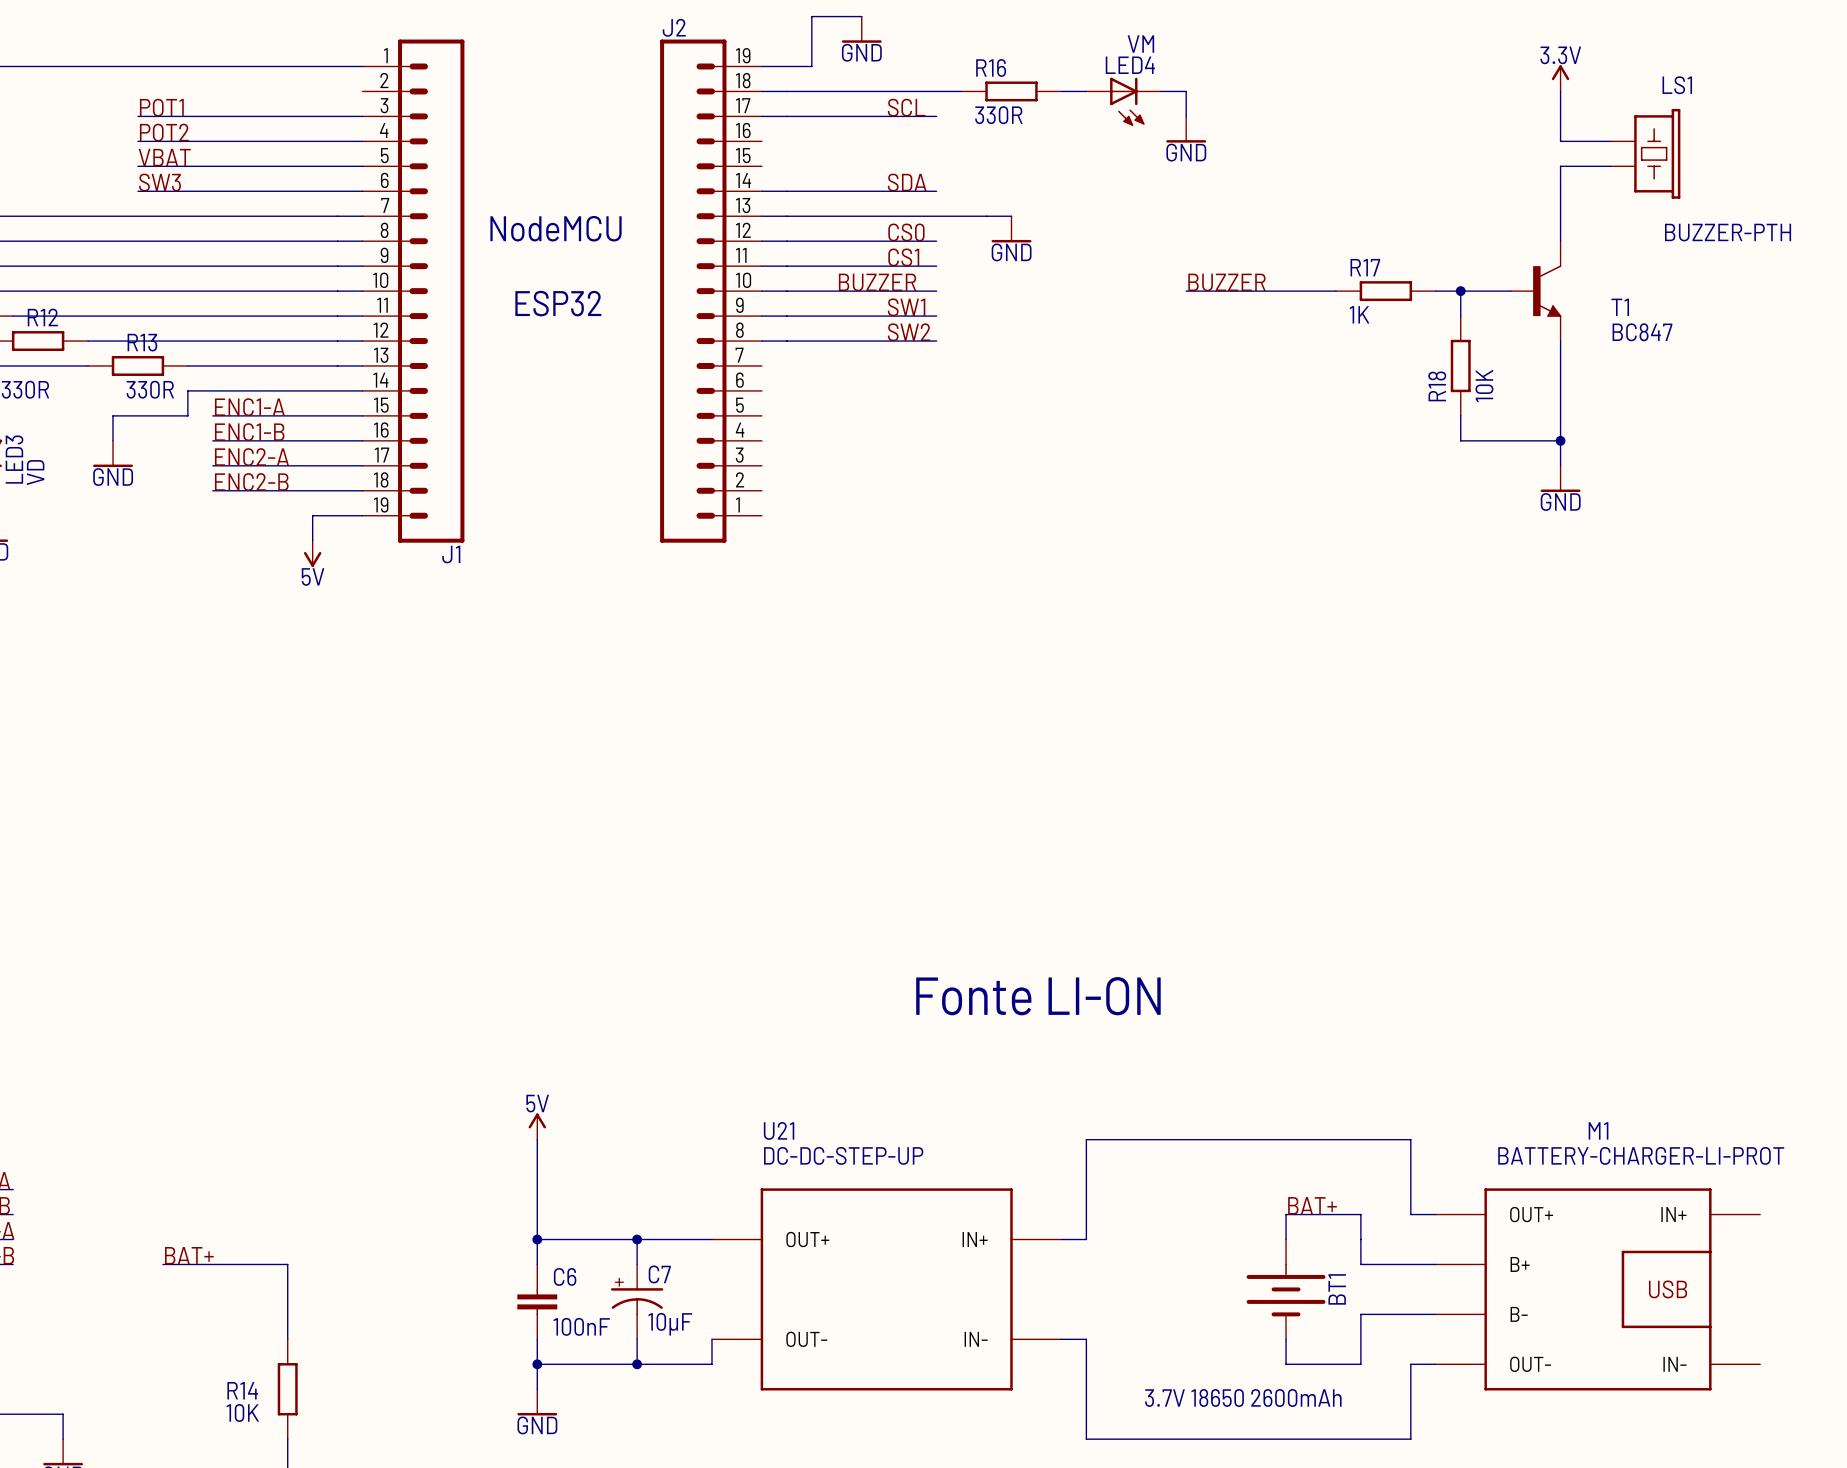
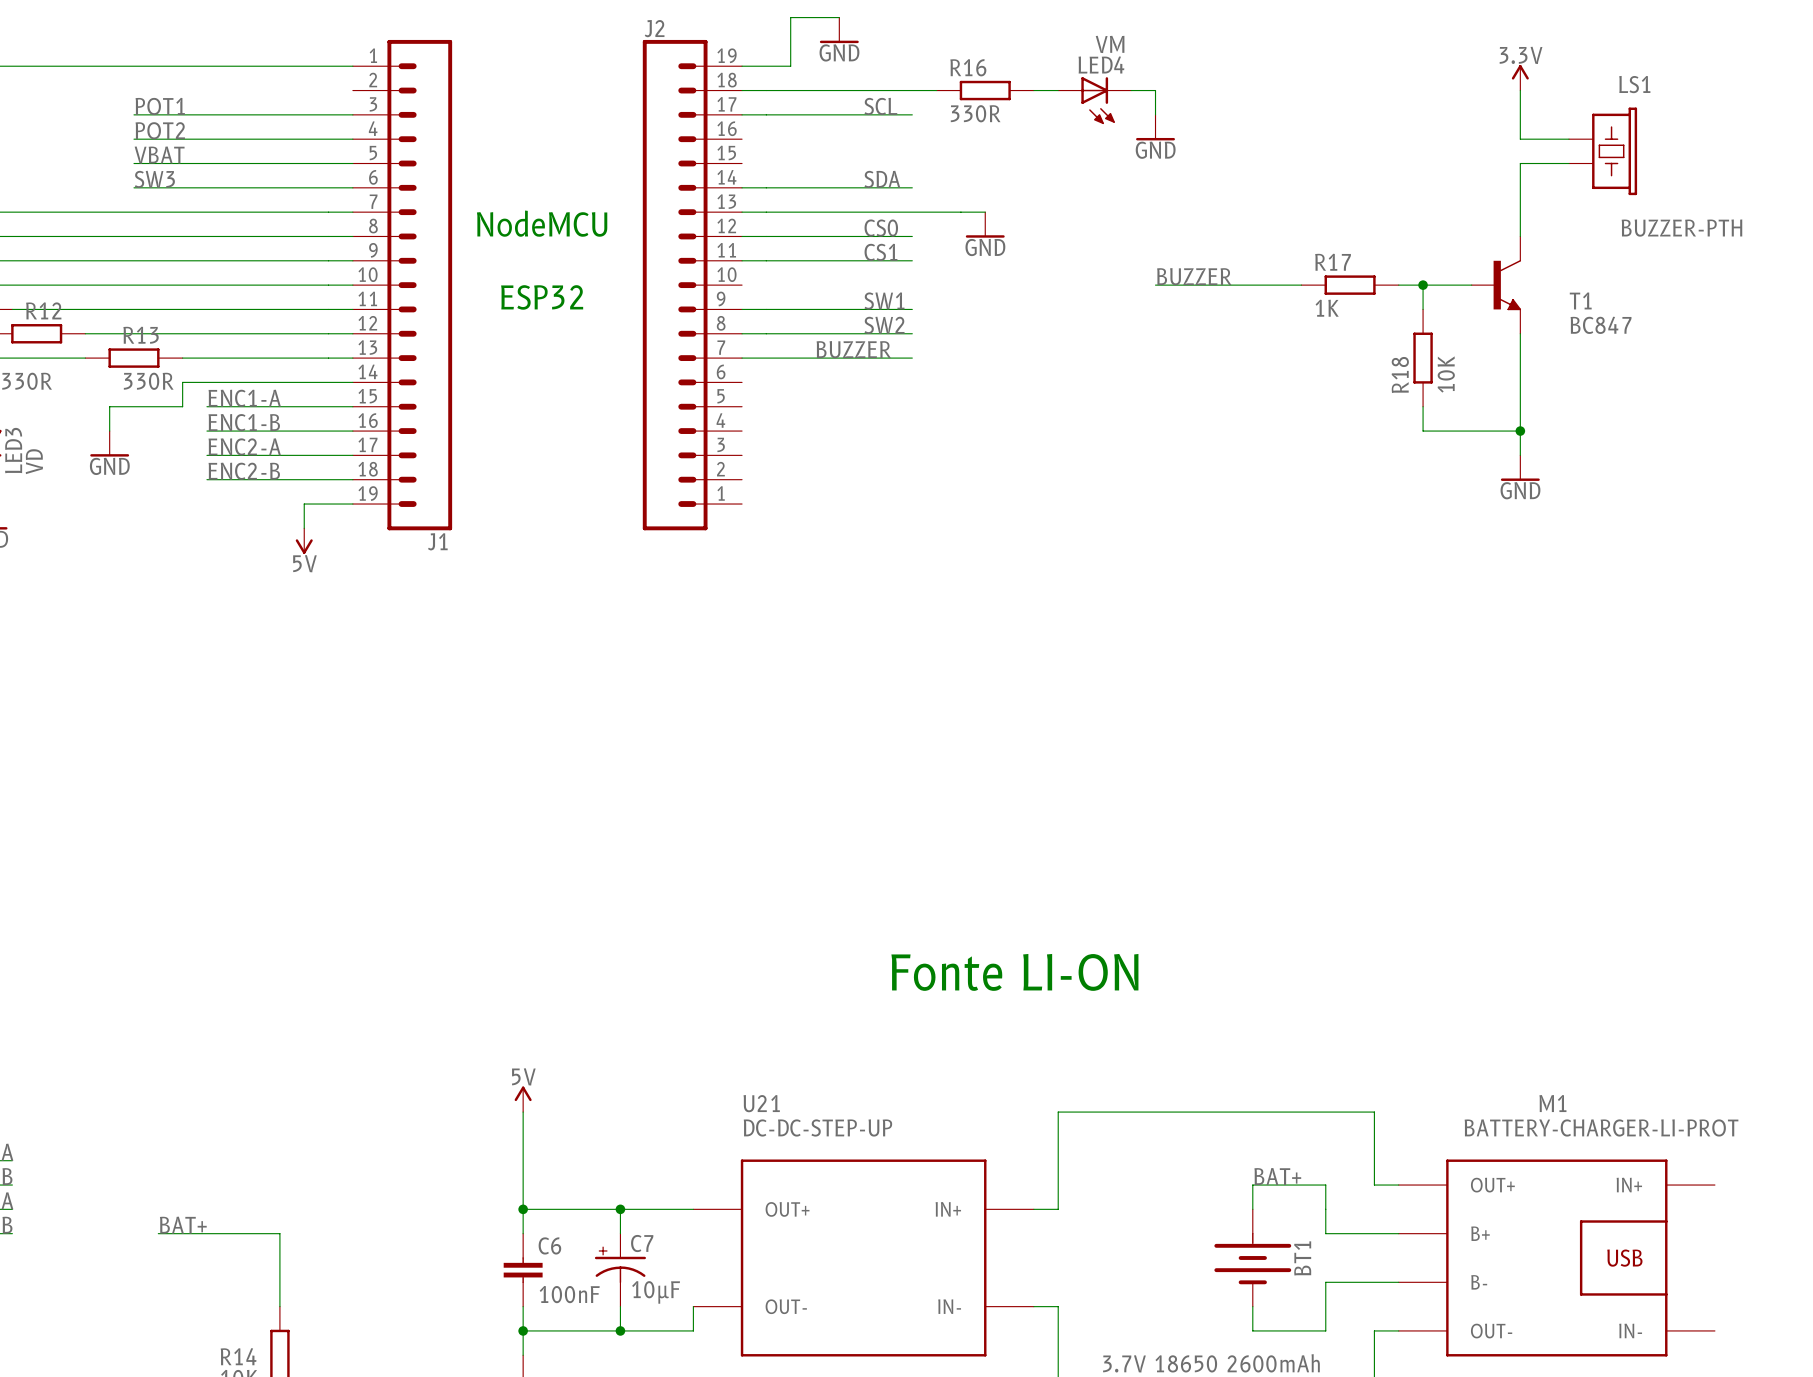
label position: BUZZER (877, 282) -> BUZZER (853, 349)
wire: (761, 291) (936, 291) -> (742, 358) (912, 358)

